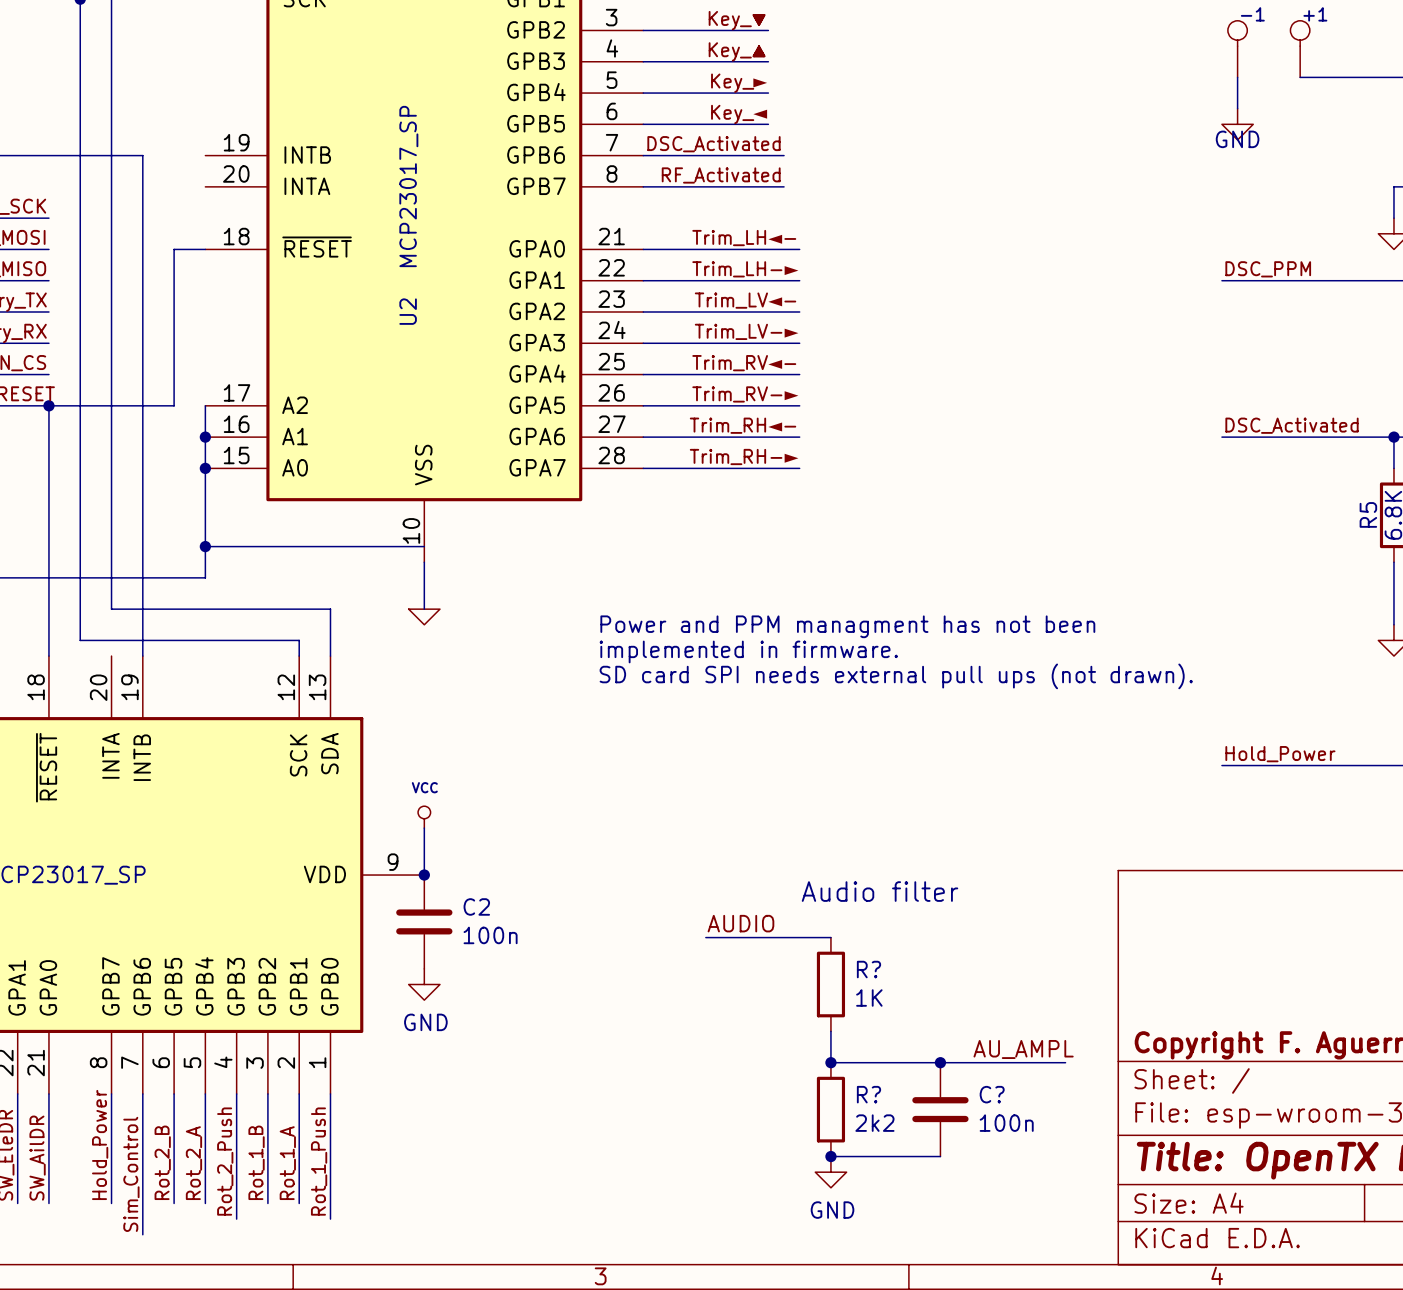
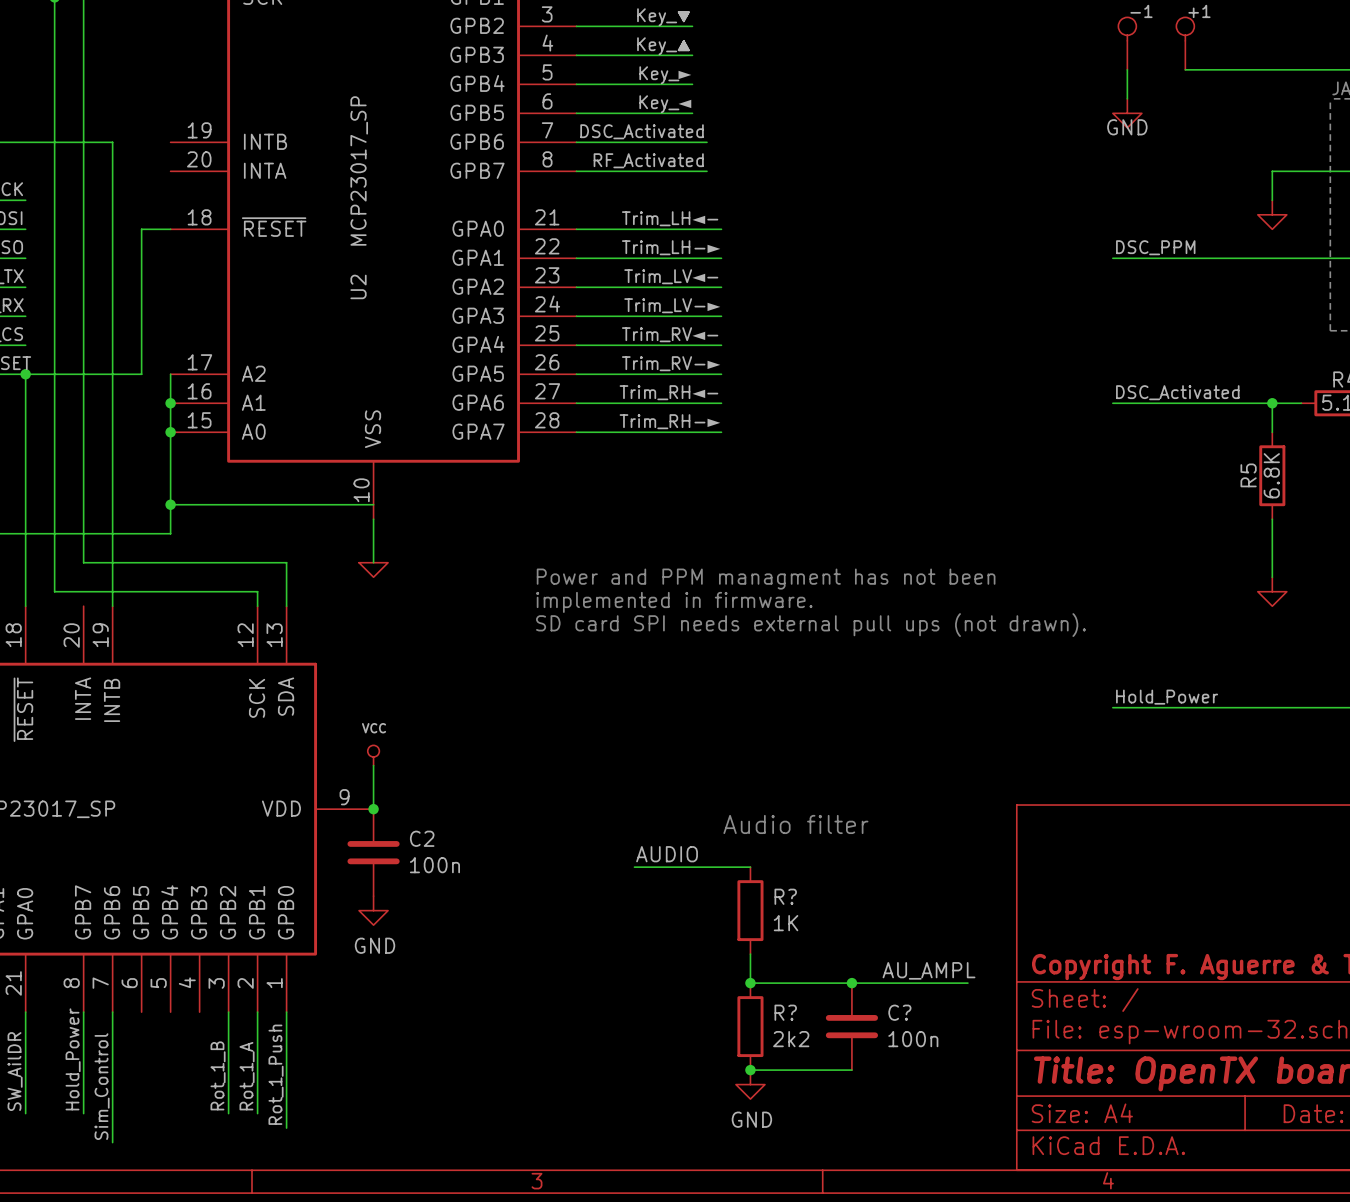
wire: (174, 1093) (174, 1203) -> none
wire: (205, 1093) (205, 1203) -> none
wire: (236, 1093) (236, 1219) -> none
label: Rot_2_Push (225, 1161) -> none
label: Rot_2_B (162, 1162) -> none
label: Rot_2_A (193, 1163) -> none

